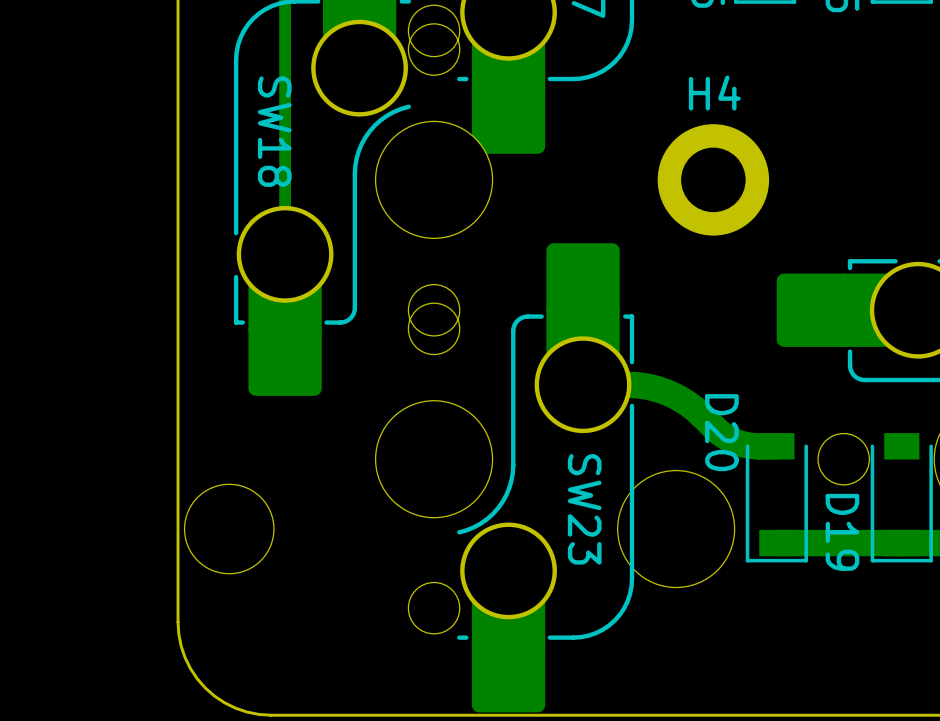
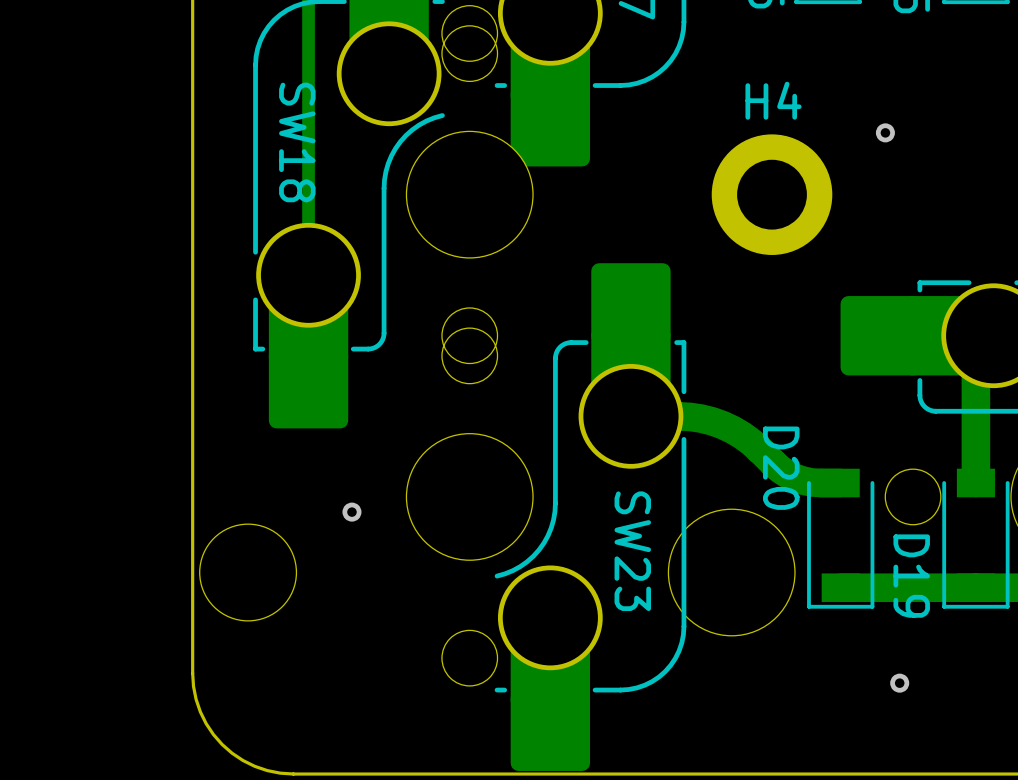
via: none -> (885, 132)
track: none -> (993, 335) (975, 353) (975, 482)
via: none -> (351, 512)
via: none -> (899, 683)

